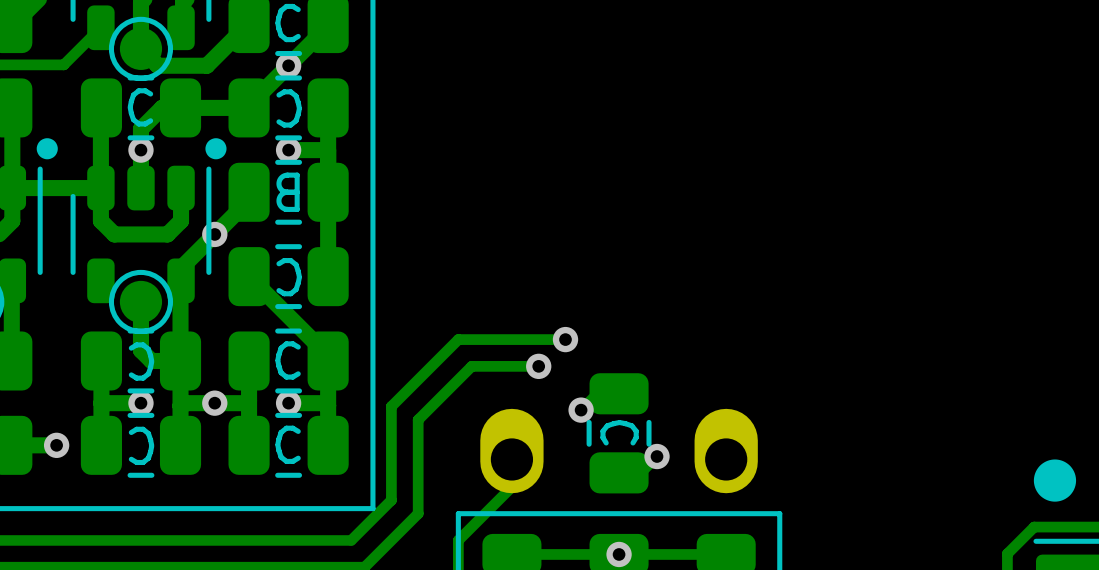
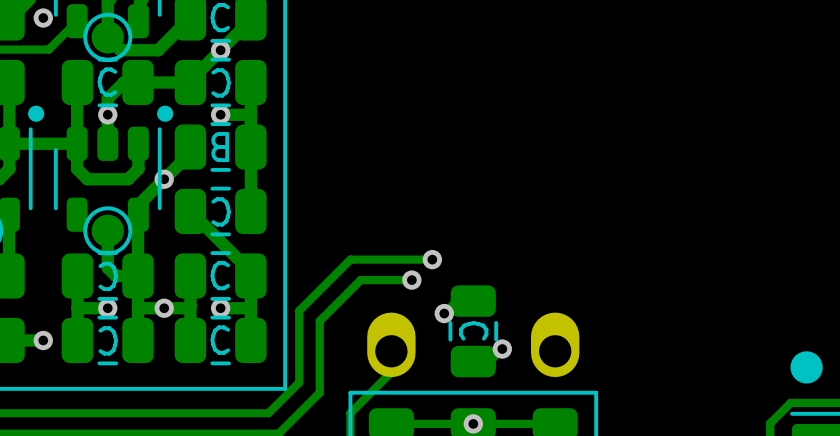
via: none -> (43, 18)

